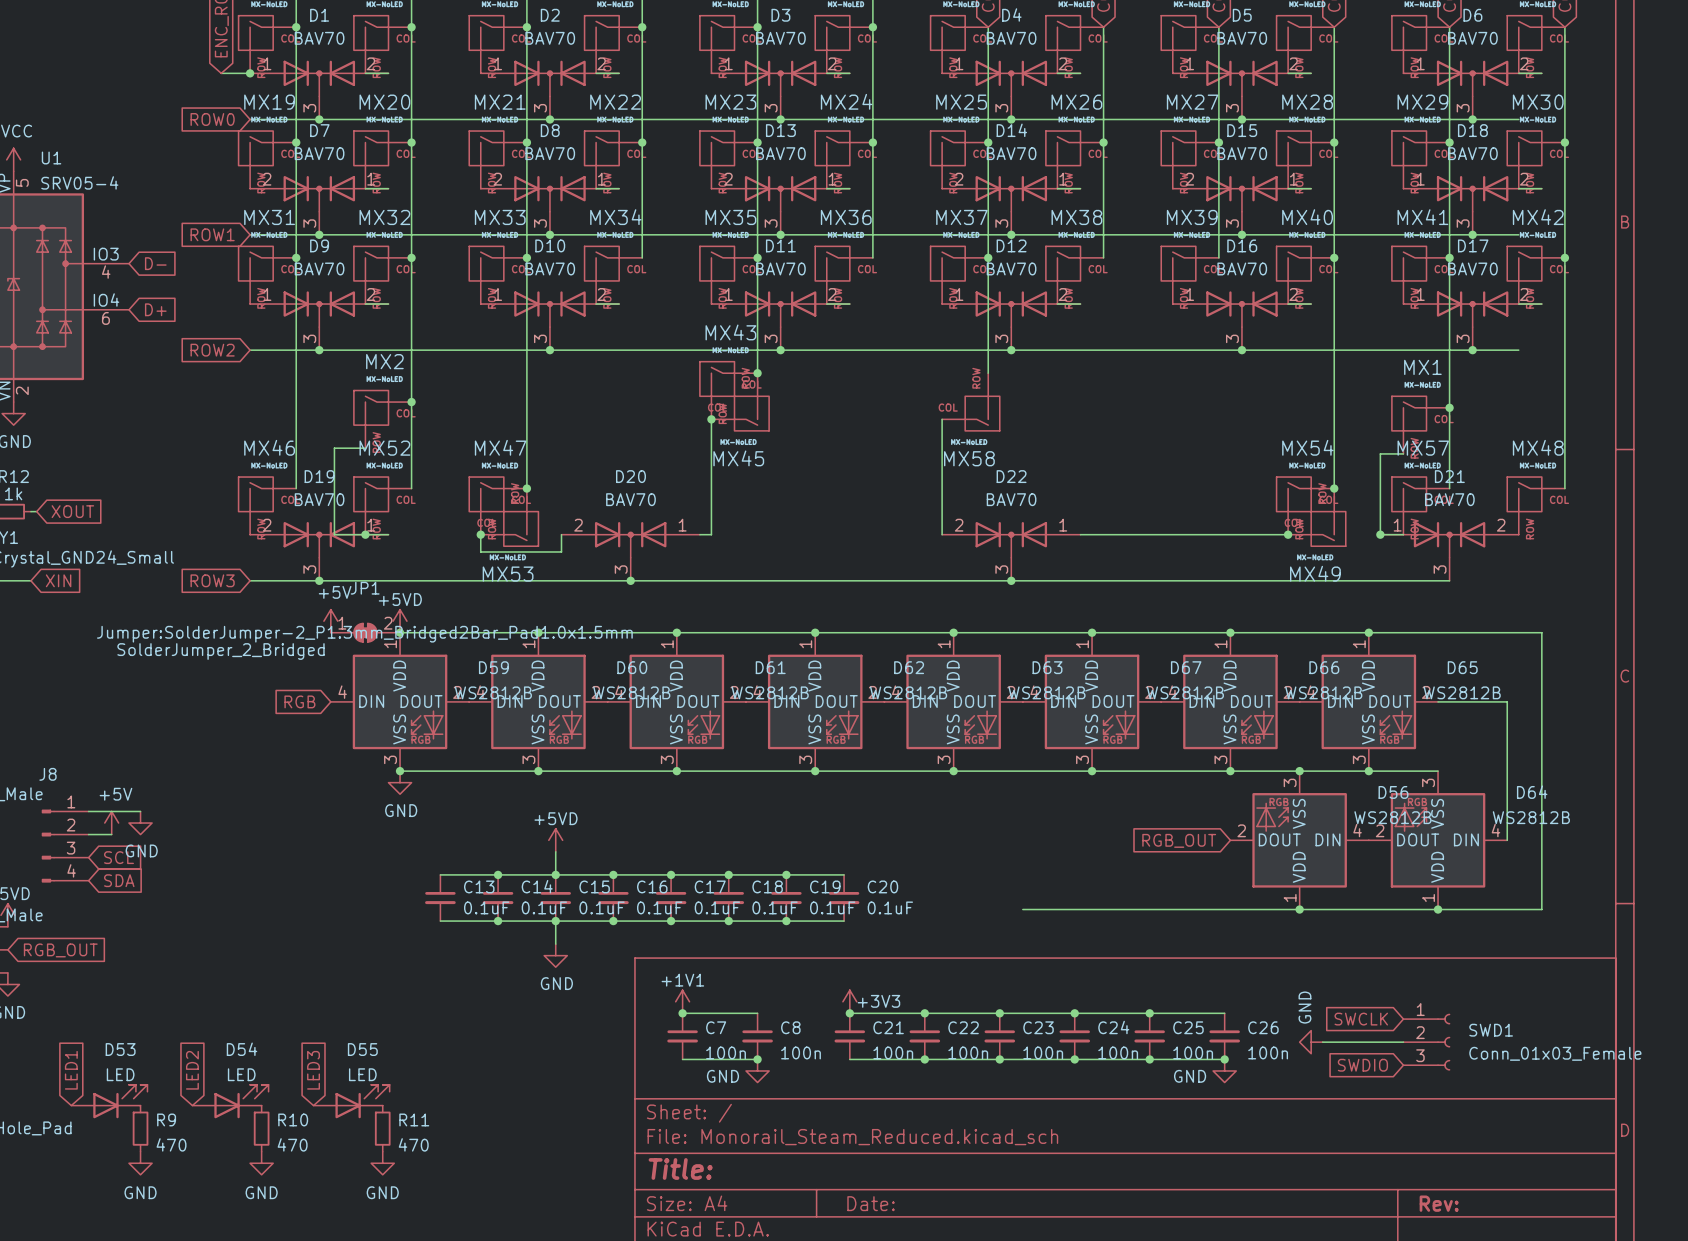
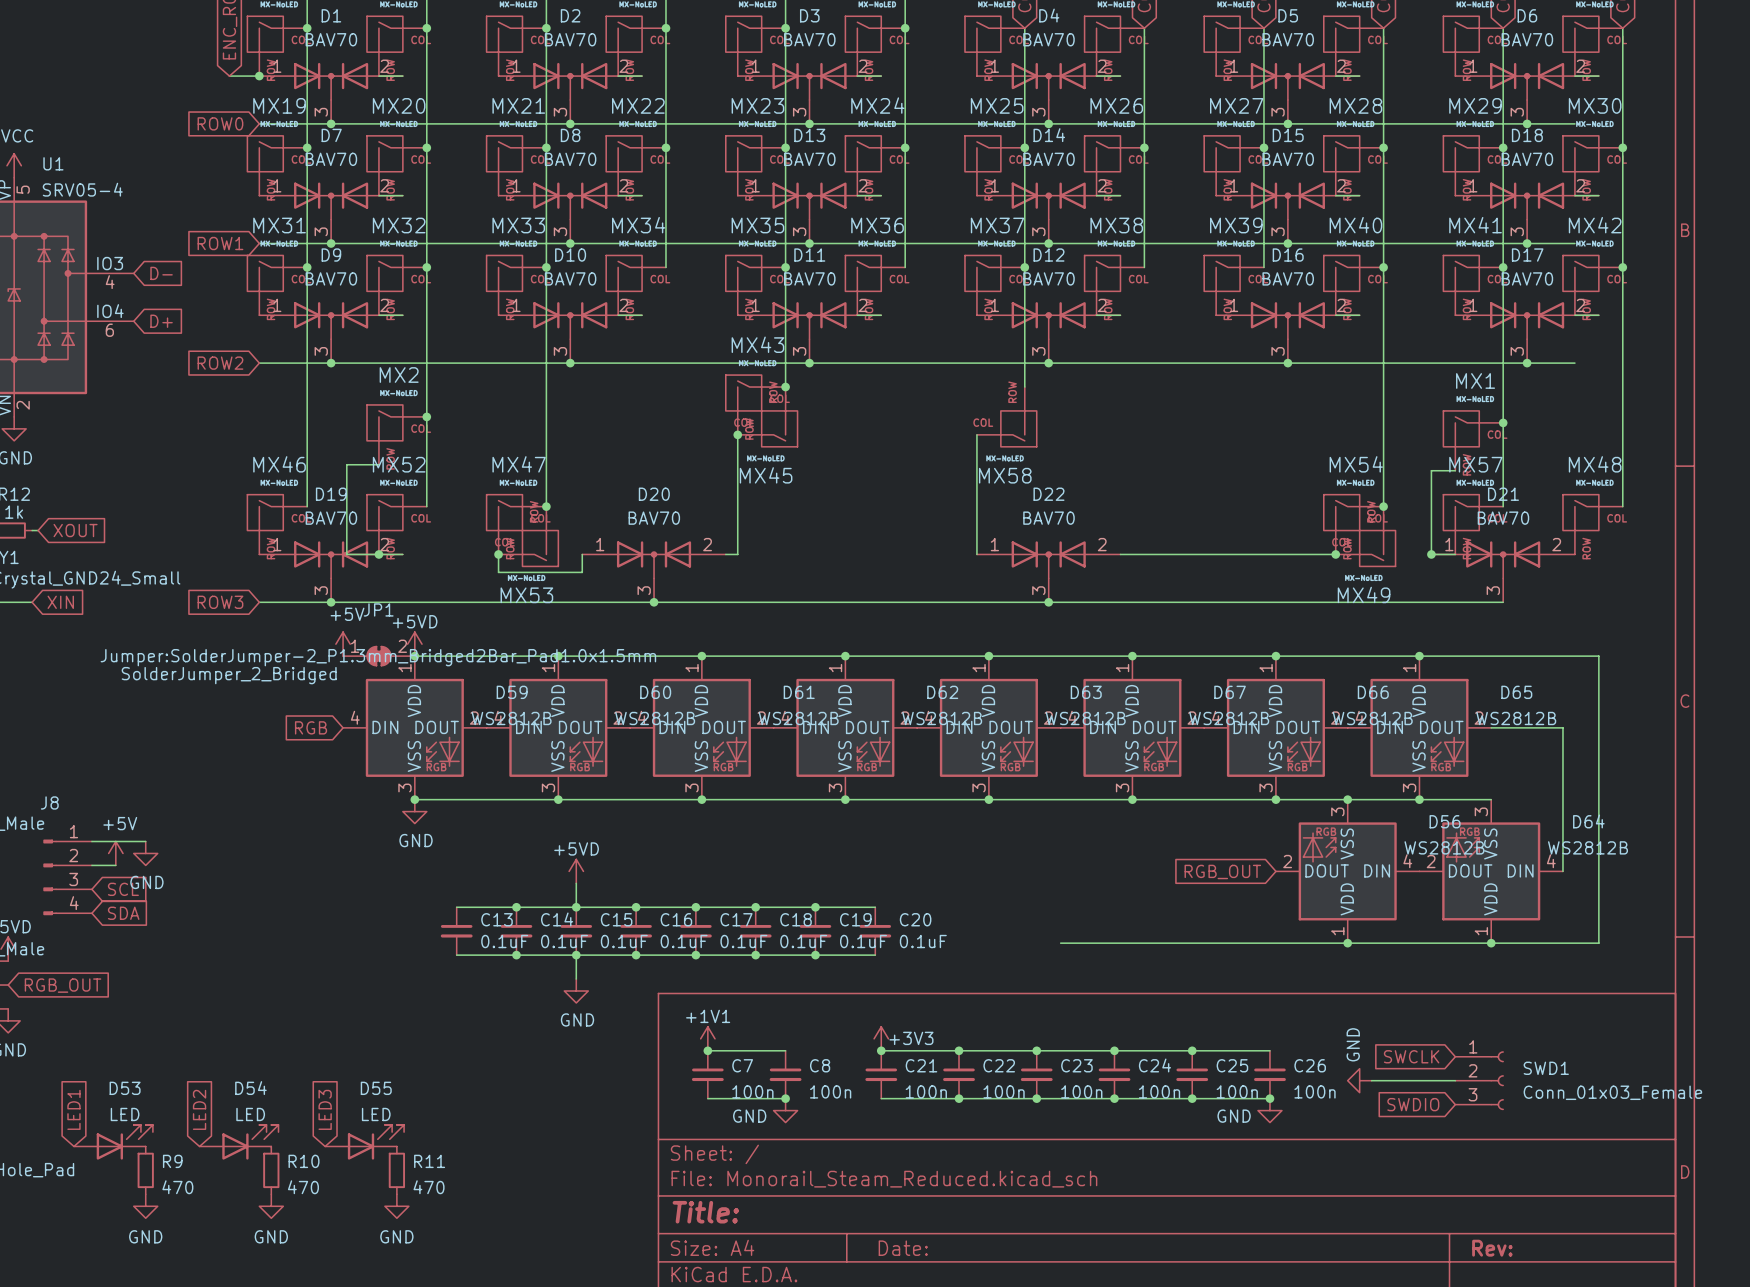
D7 flip: as is (319, 193) -> left-right (331, 201)
D8 flip: as is (549, 193) -> left-right (570, 201)
D13 flip: as is (780, 193) -> left-right (809, 201)
D14 flip: as is (1011, 193) -> left-right (1048, 201)
D15 flip: as is (1241, 193) -> left-right (1287, 201)
D19 flip: as is (319, 539) -> left-right (331, 559)
D20 flip: as is (630, 539) -> left-right (654, 559)
D22 flip: as is (1011, 539) -> left-right (1048, 559)

